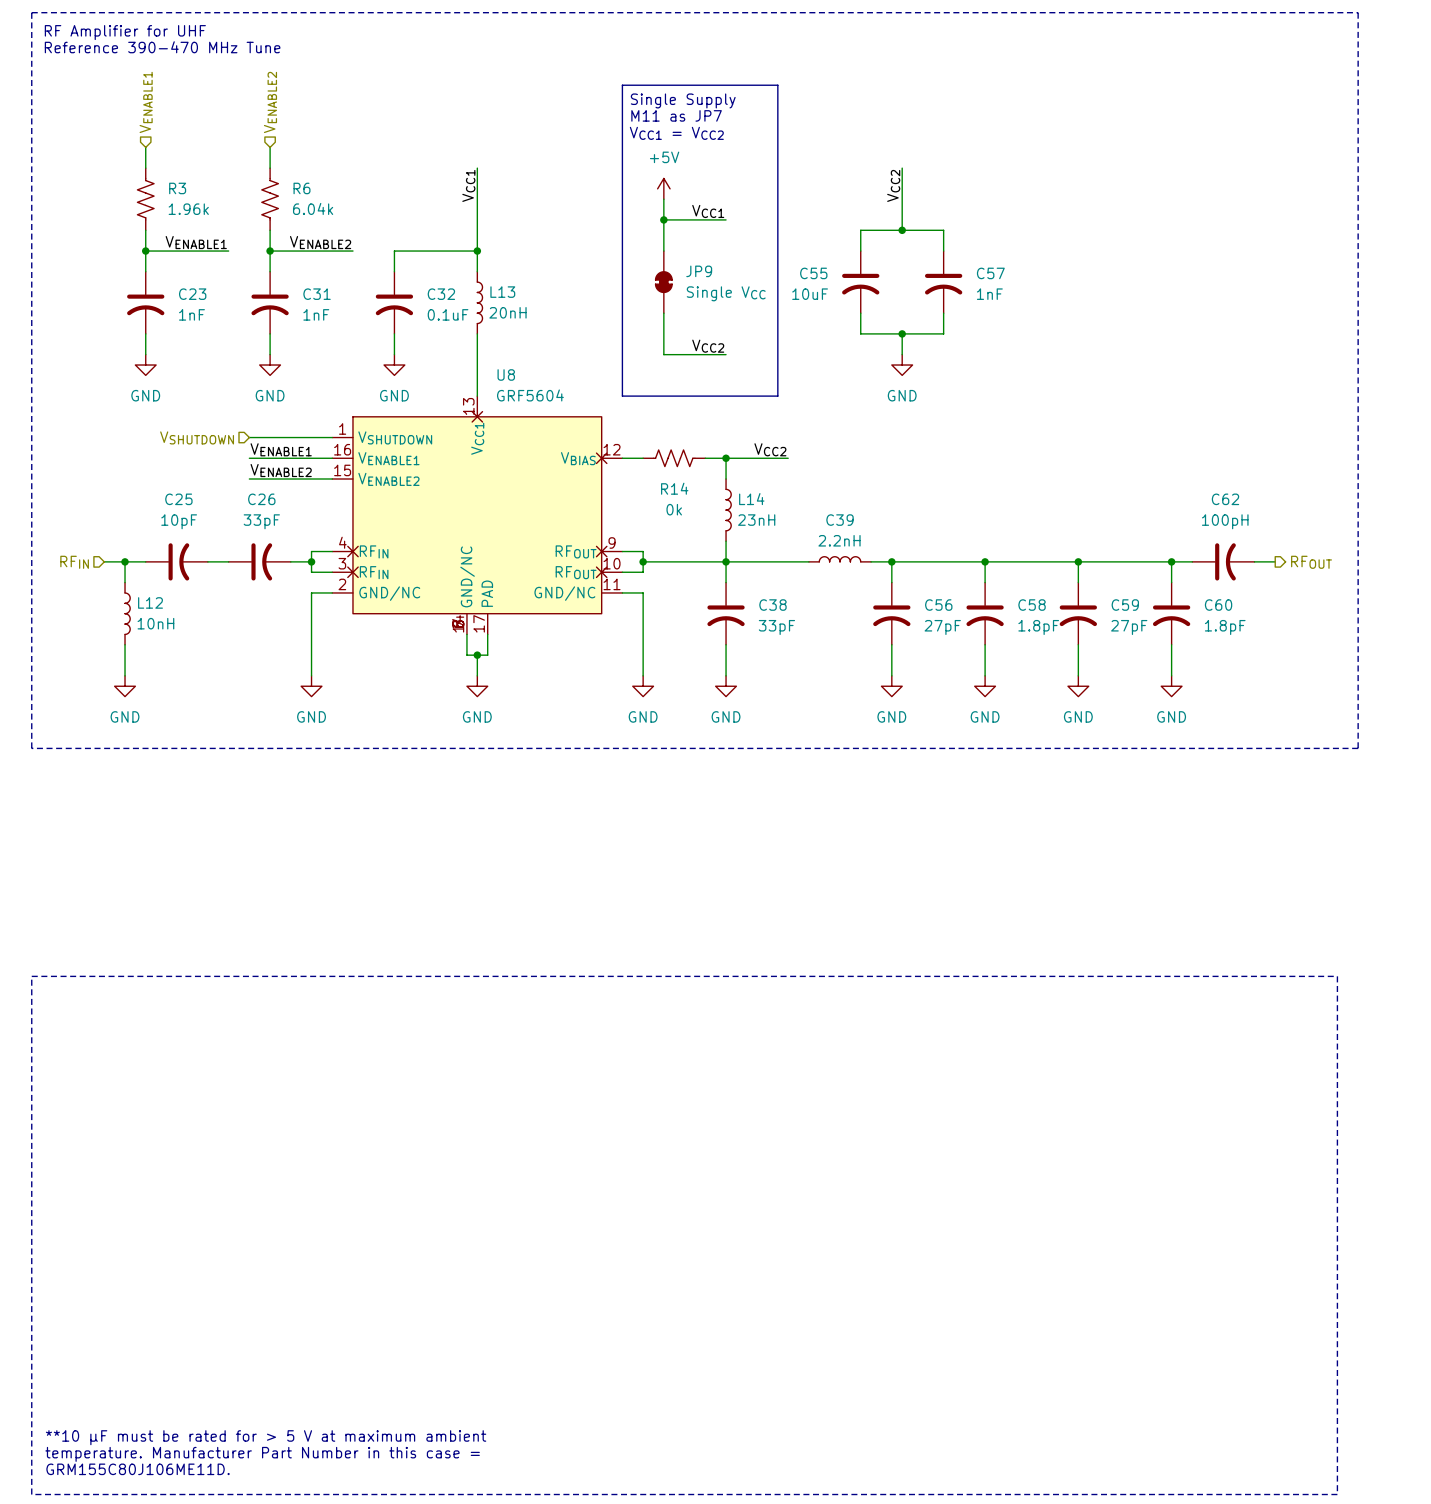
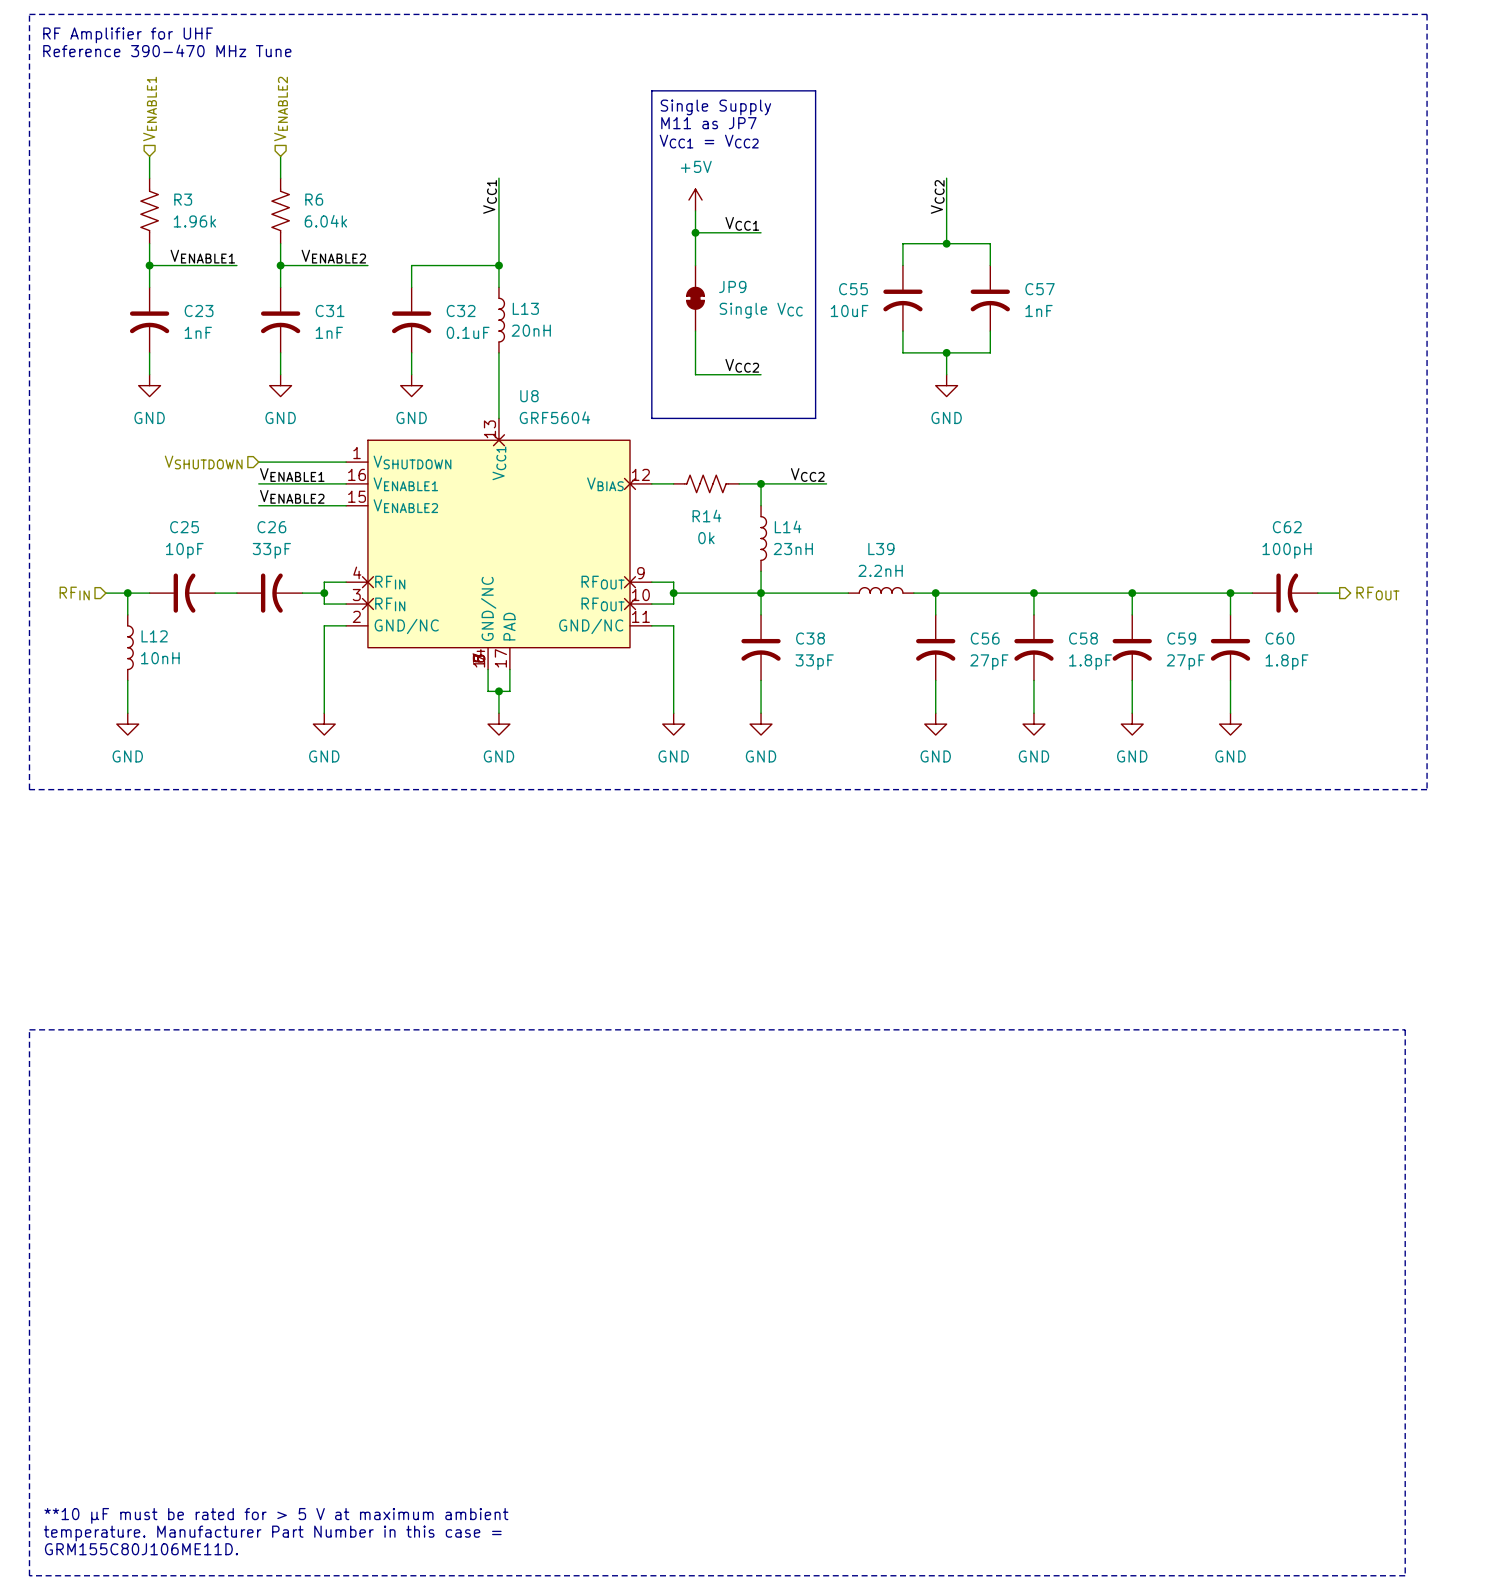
C39 name: C39 (840, 520) -> L39 (881, 549)

